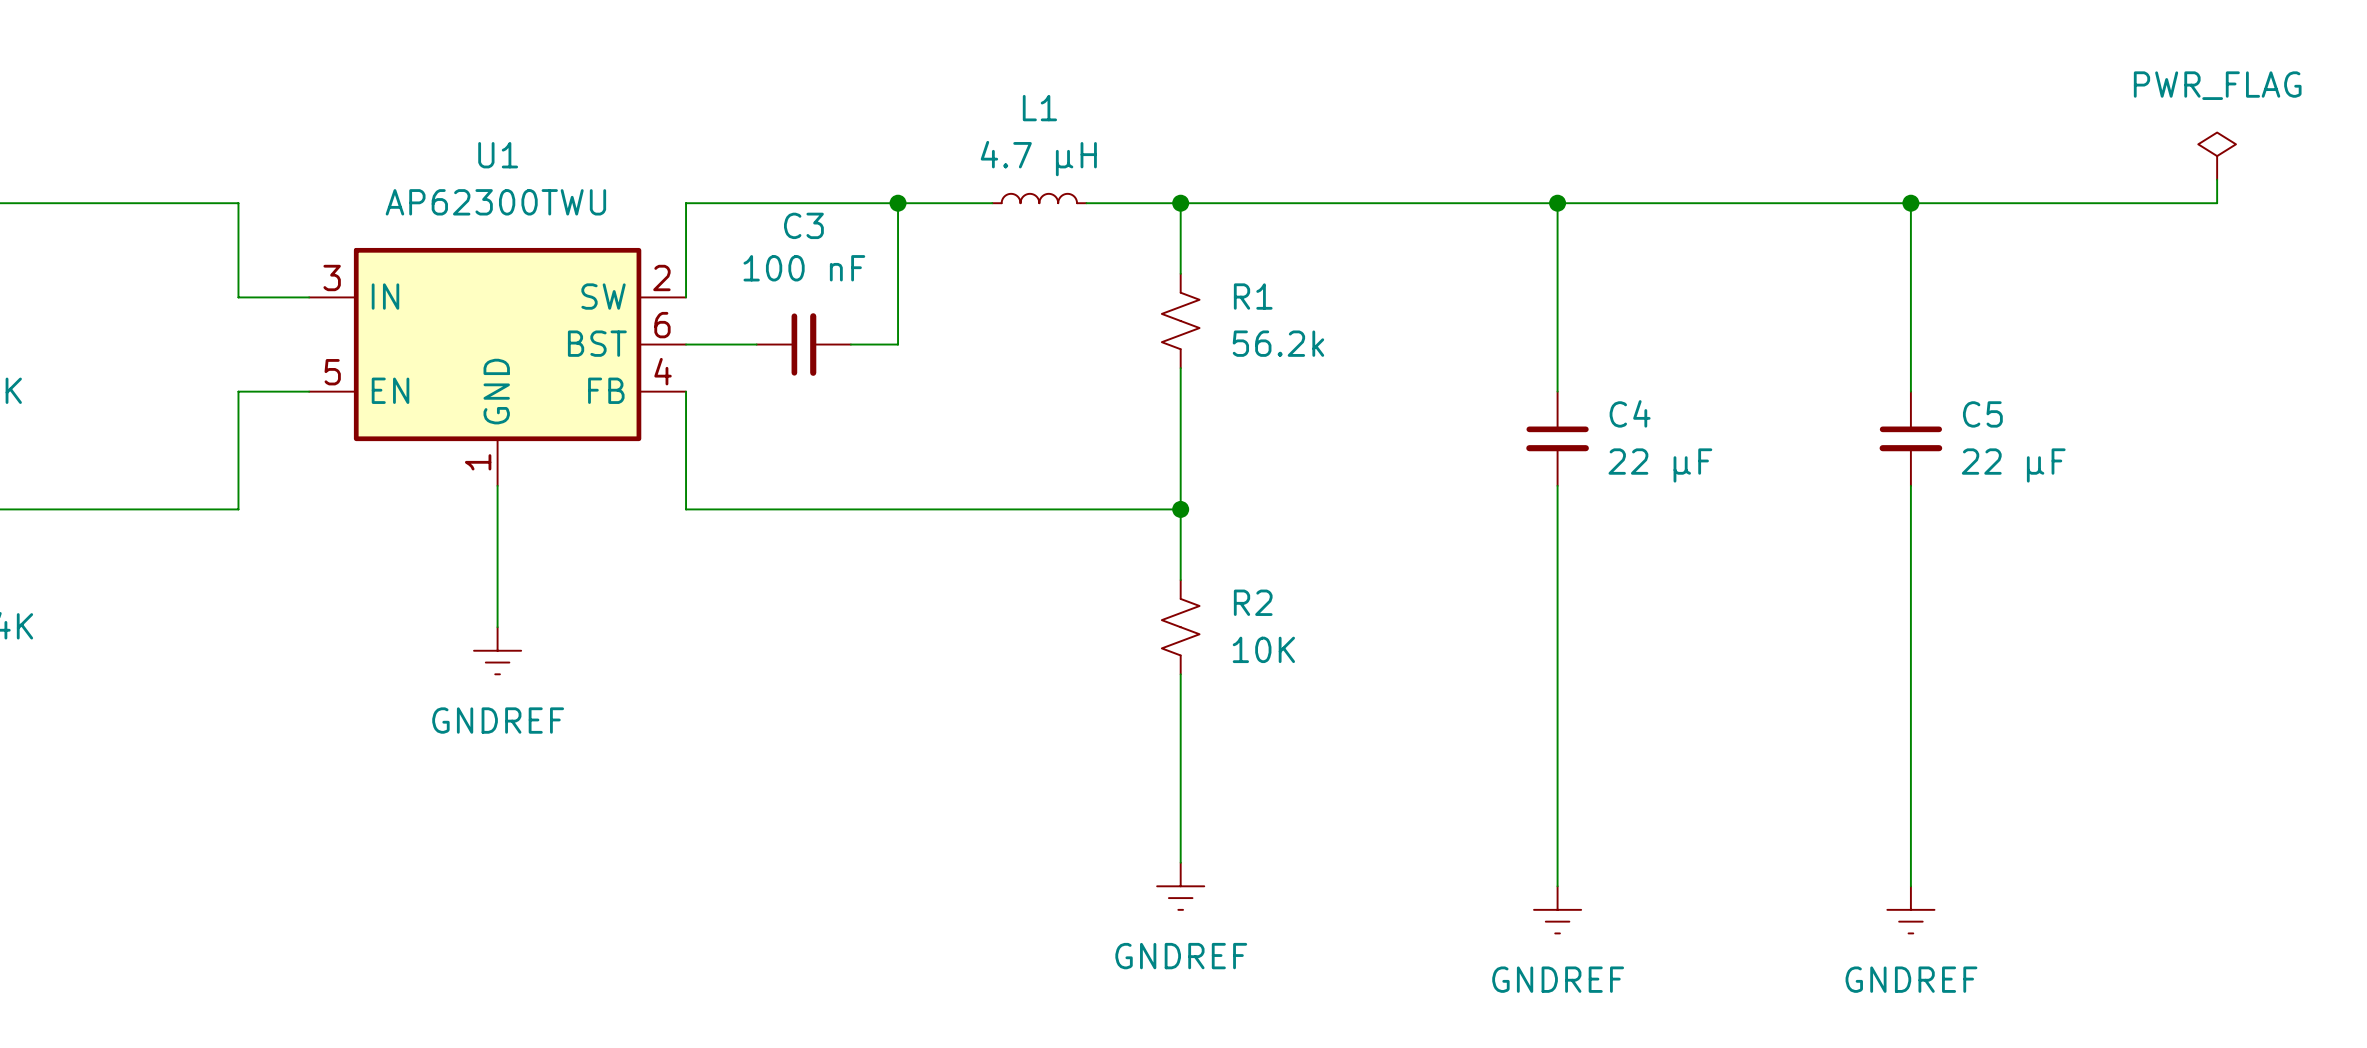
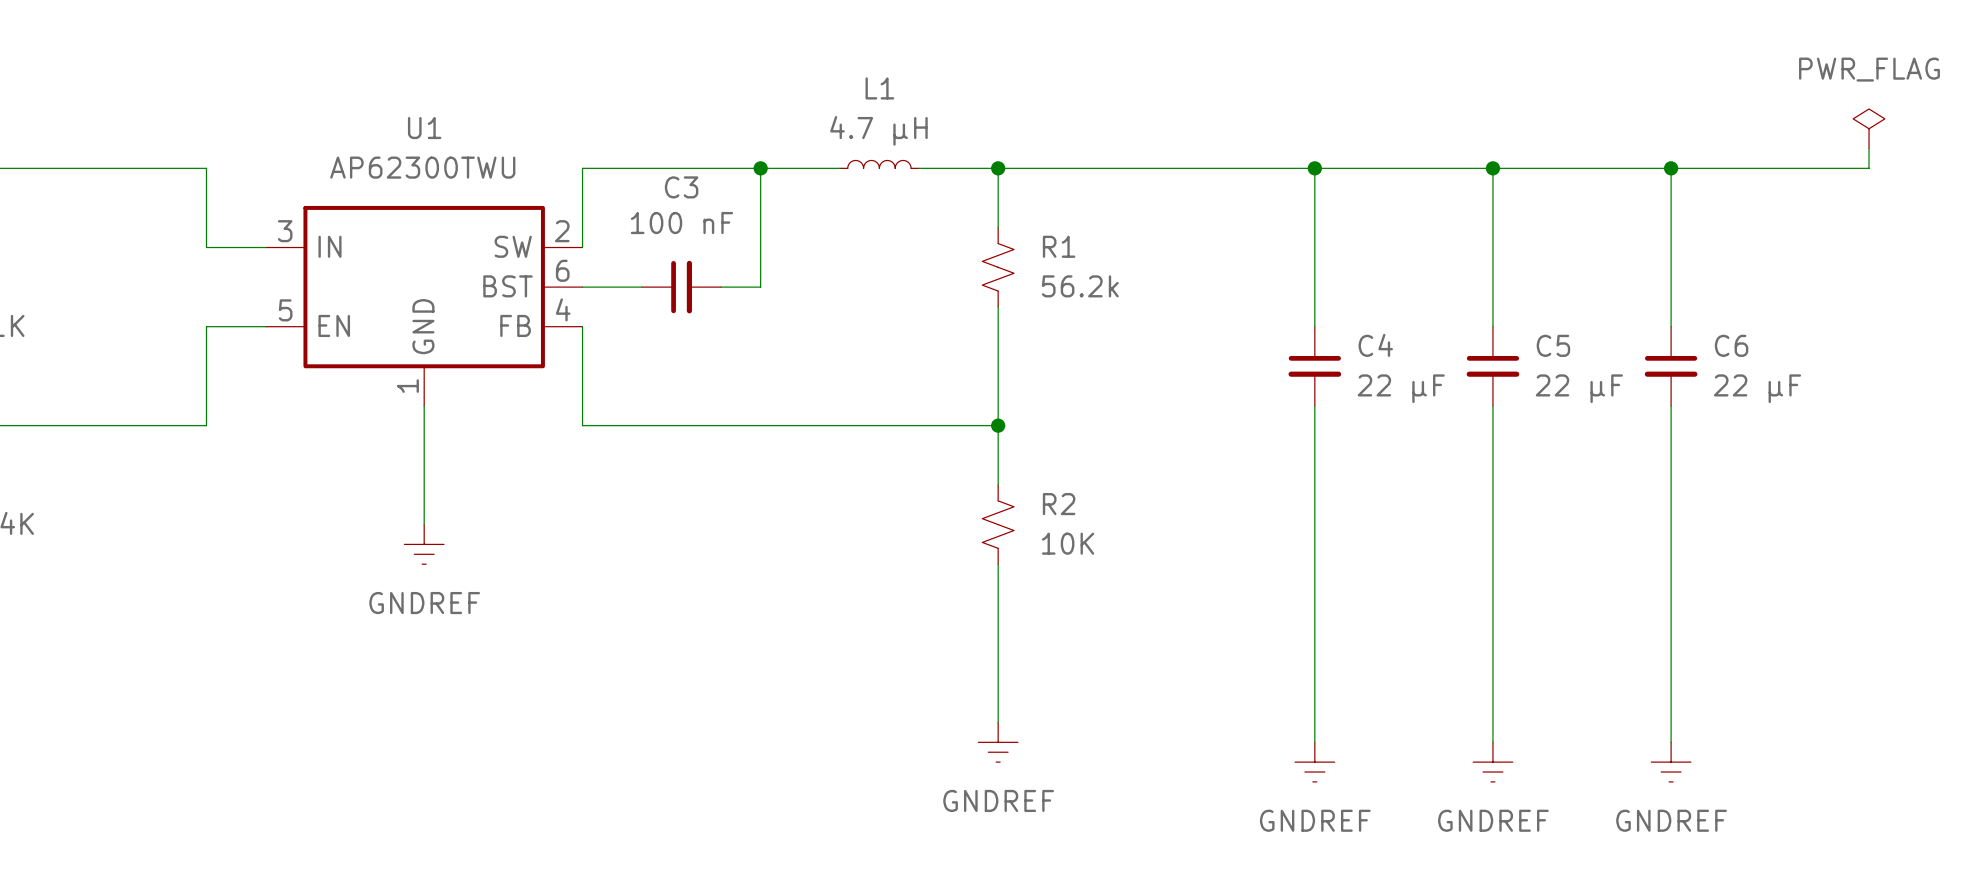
wire: none -> (1492, 168) (1492, 326)
junction: none -> (1492, 168)
wire: (1910, 203) (1910, 391) -> (1671, 168) (1671, 326)
junction: (1910, 203) -> none
junction: none -> (1671, 168)
C5 position: (1910, 438) -> (1492, 366)
C6: none -> 22 µF (1671, 366)
wire: none -> (1492, 405) (1492, 742)
wire: (1910, 485) (1910, 886) -> (1671, 405) (1671, 742)
power symbol: none -> GNDREF (1492, 762)
power symbol: GNDREF (1910, 909) -> none
power symbol: none -> GNDREF (1671, 762)

